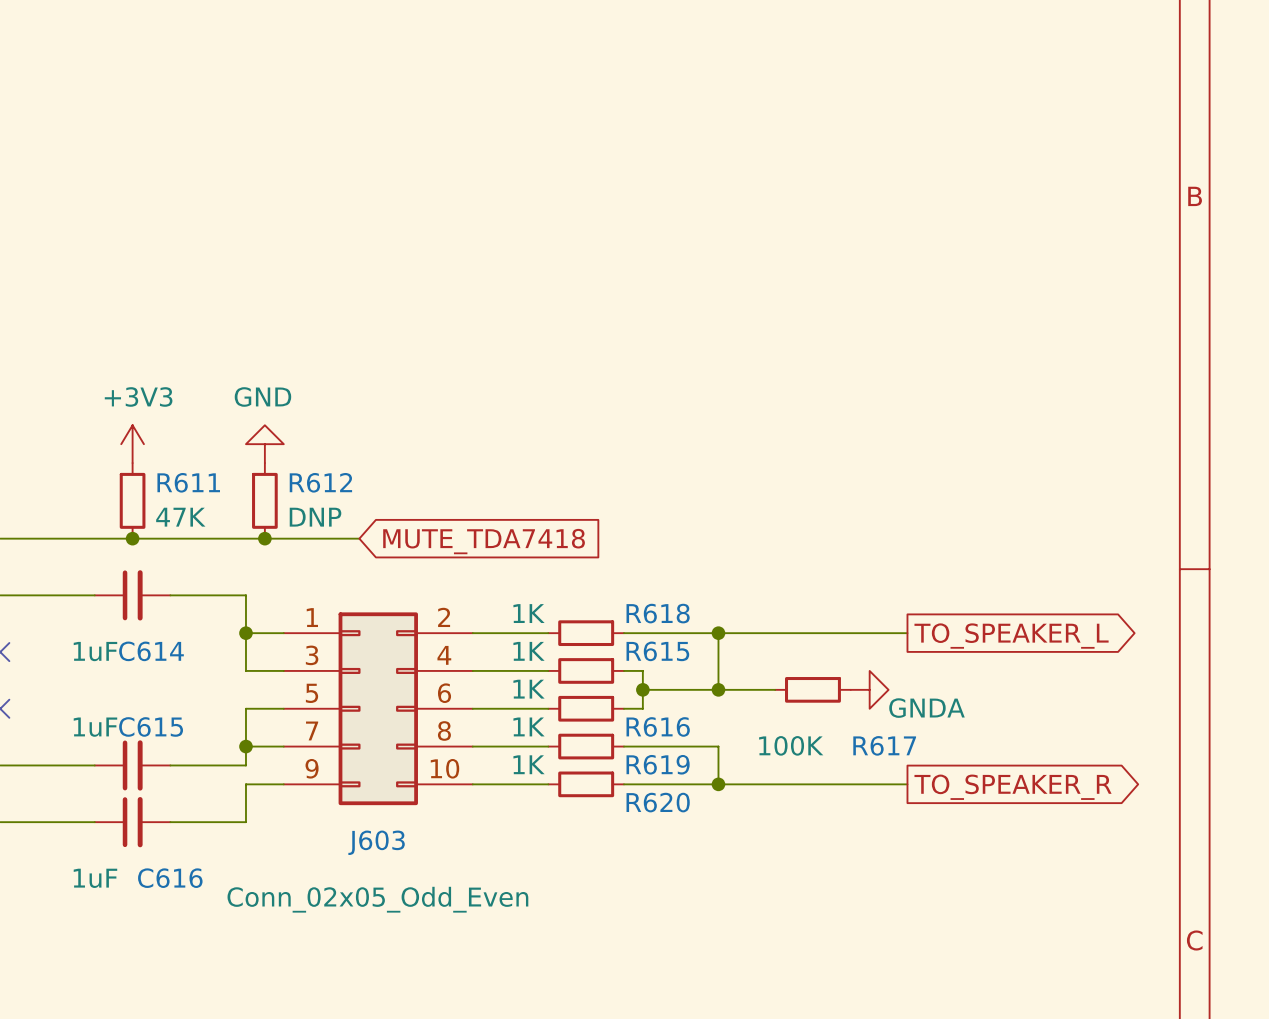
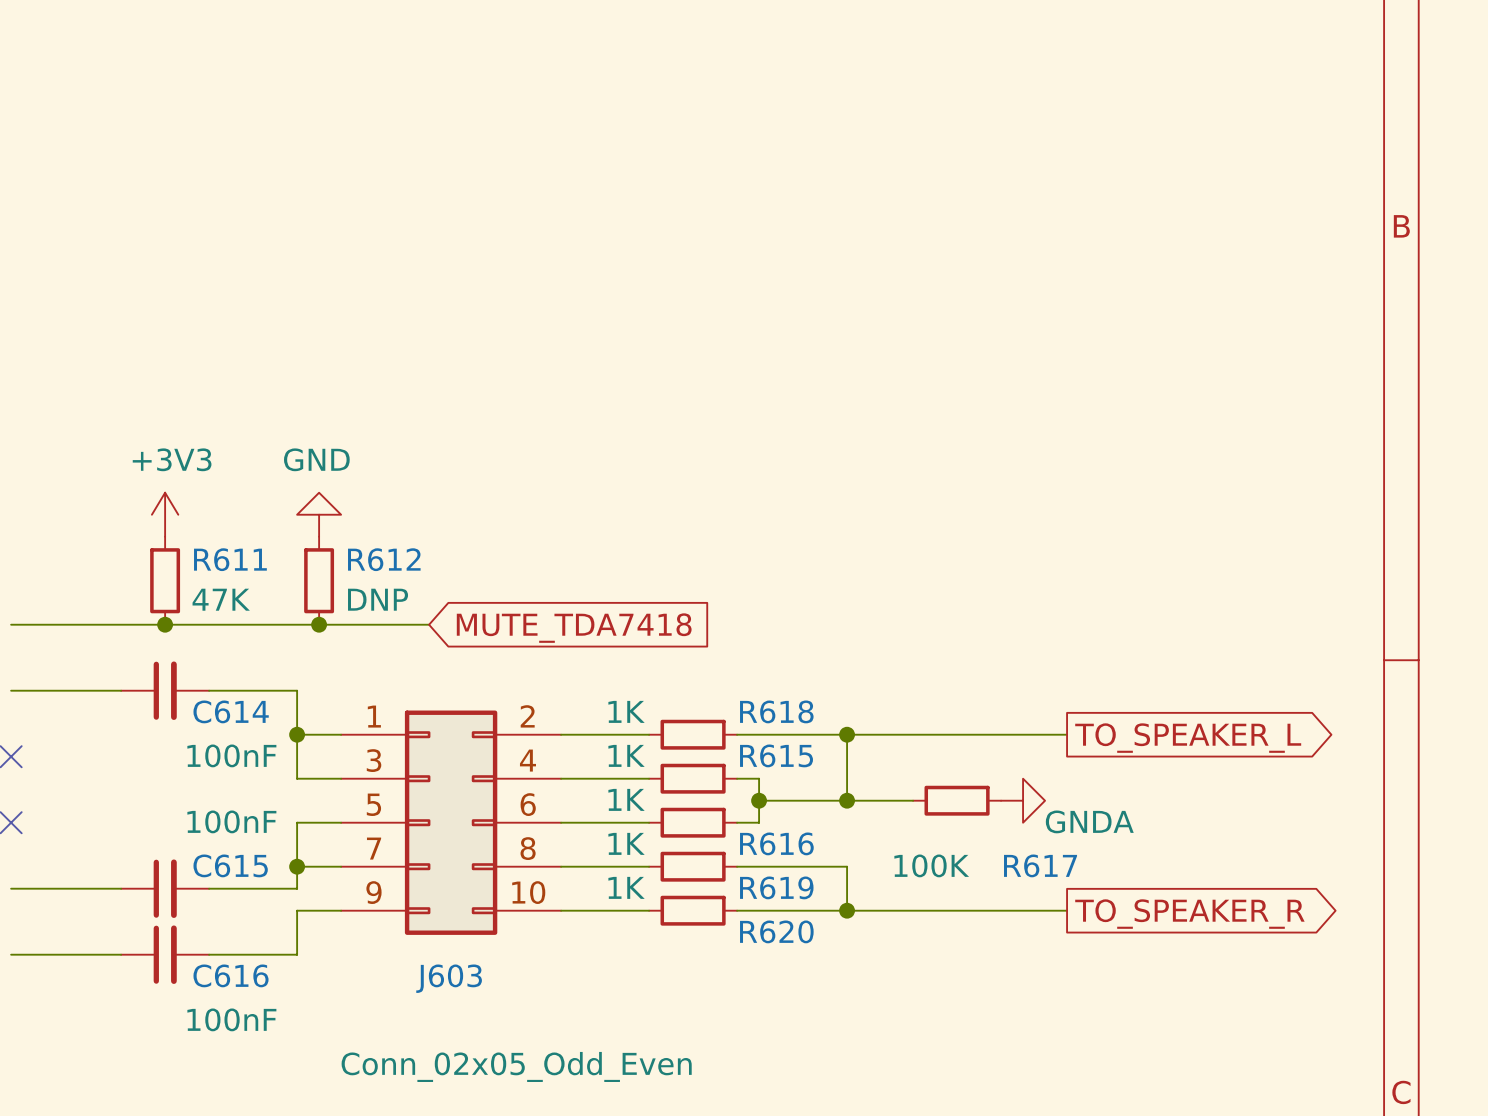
C614 value: 1uF (95, 651) -> 100nF (231, 755)
C614 name position: C614 (151, 651) -> C614 (231, 711)
C615 name position: C615 (151, 726) -> C615 (230, 865)
C615 value: 1uF (95, 727) -> 100nF (231, 821)
C616 value: 1uF (95, 878) -> 100nF (231, 1019)
C616 name position: C616 (170, 878) -> C616 (231, 975)
J603 value position: Conn_02x05_Odd_Even (377, 899) -> Conn_02x05_Odd_Even (516, 1066)

